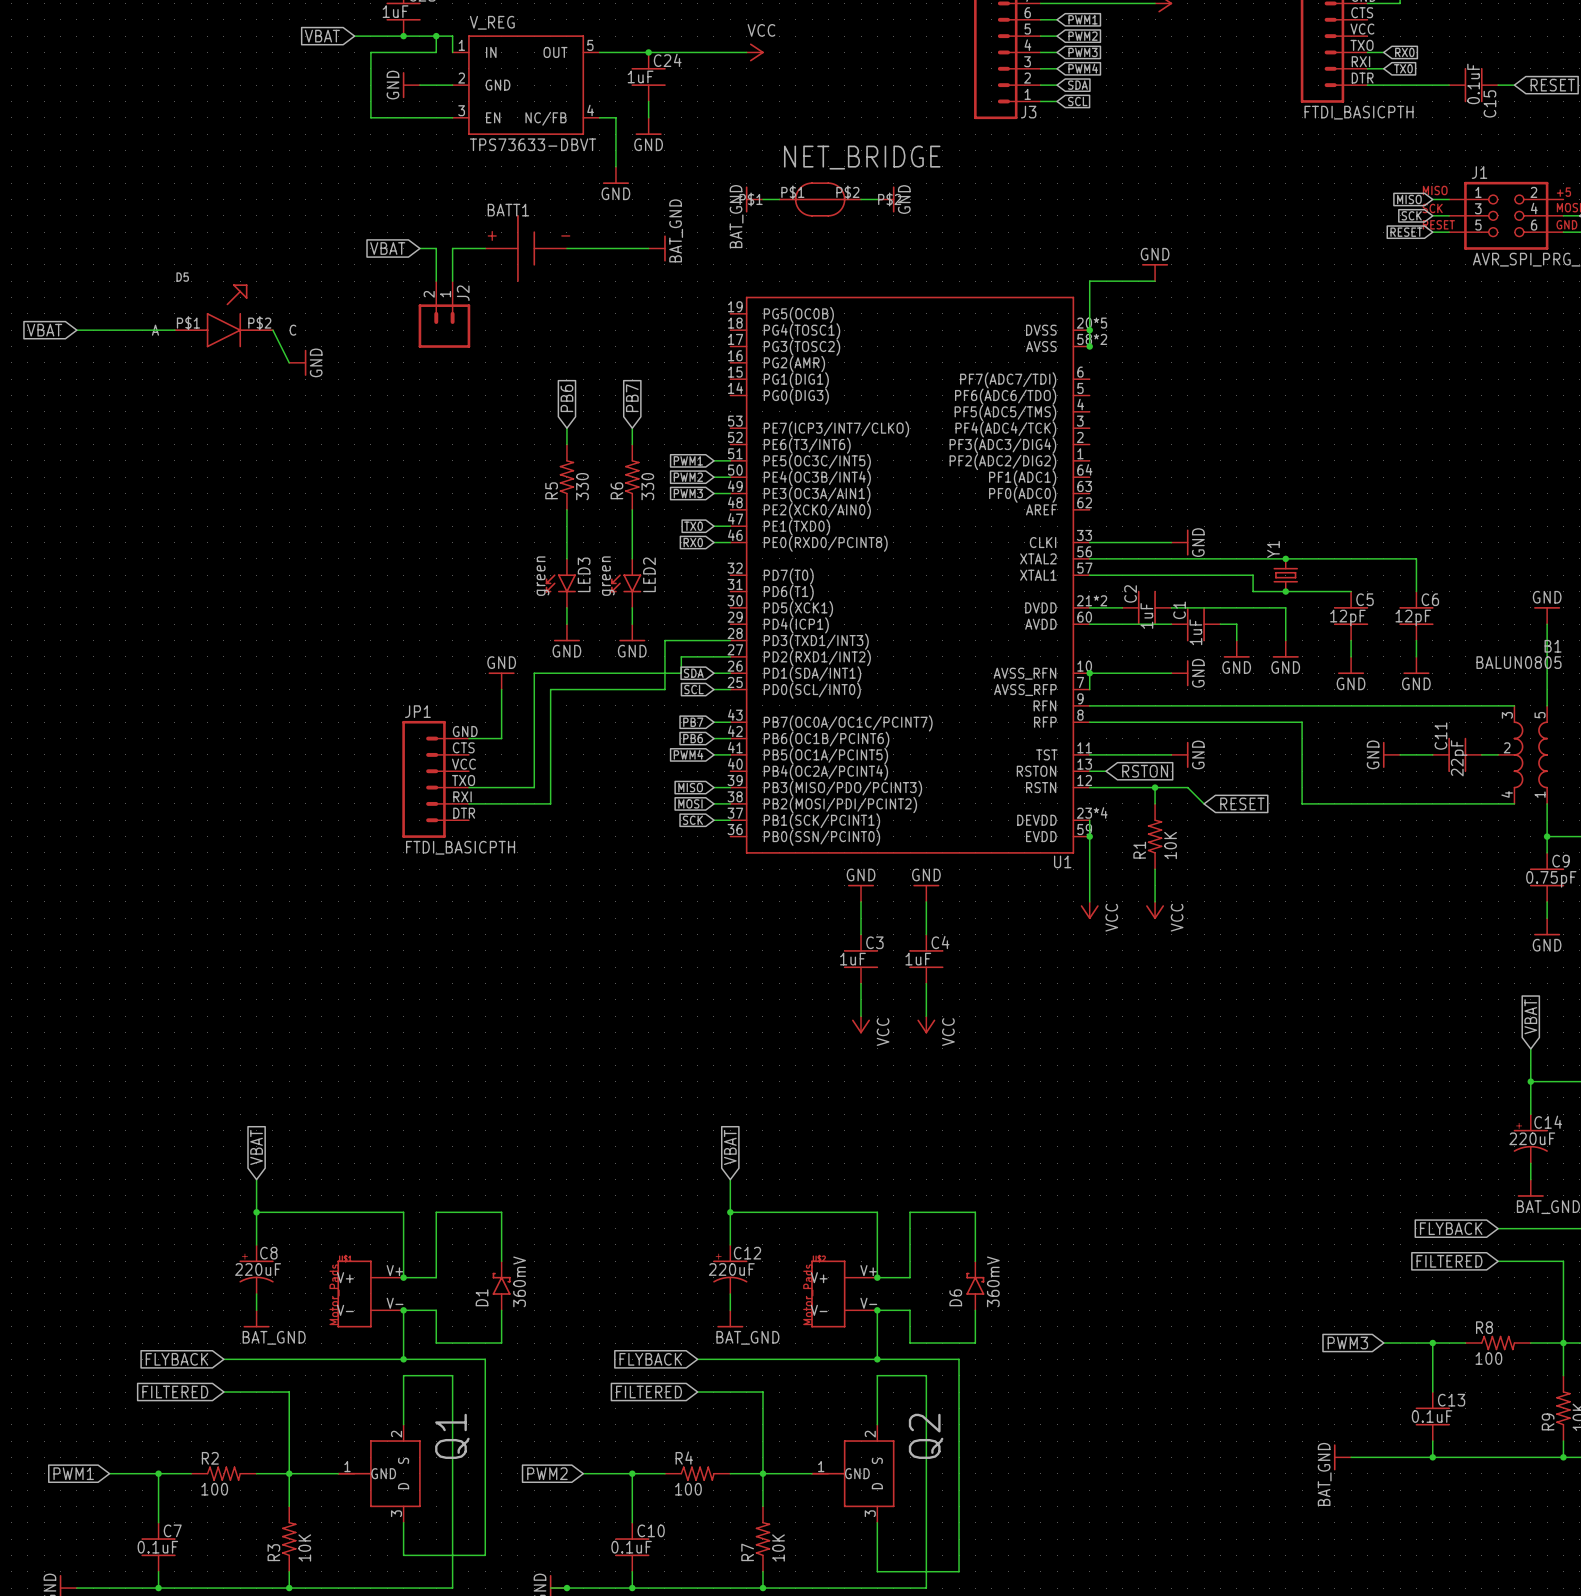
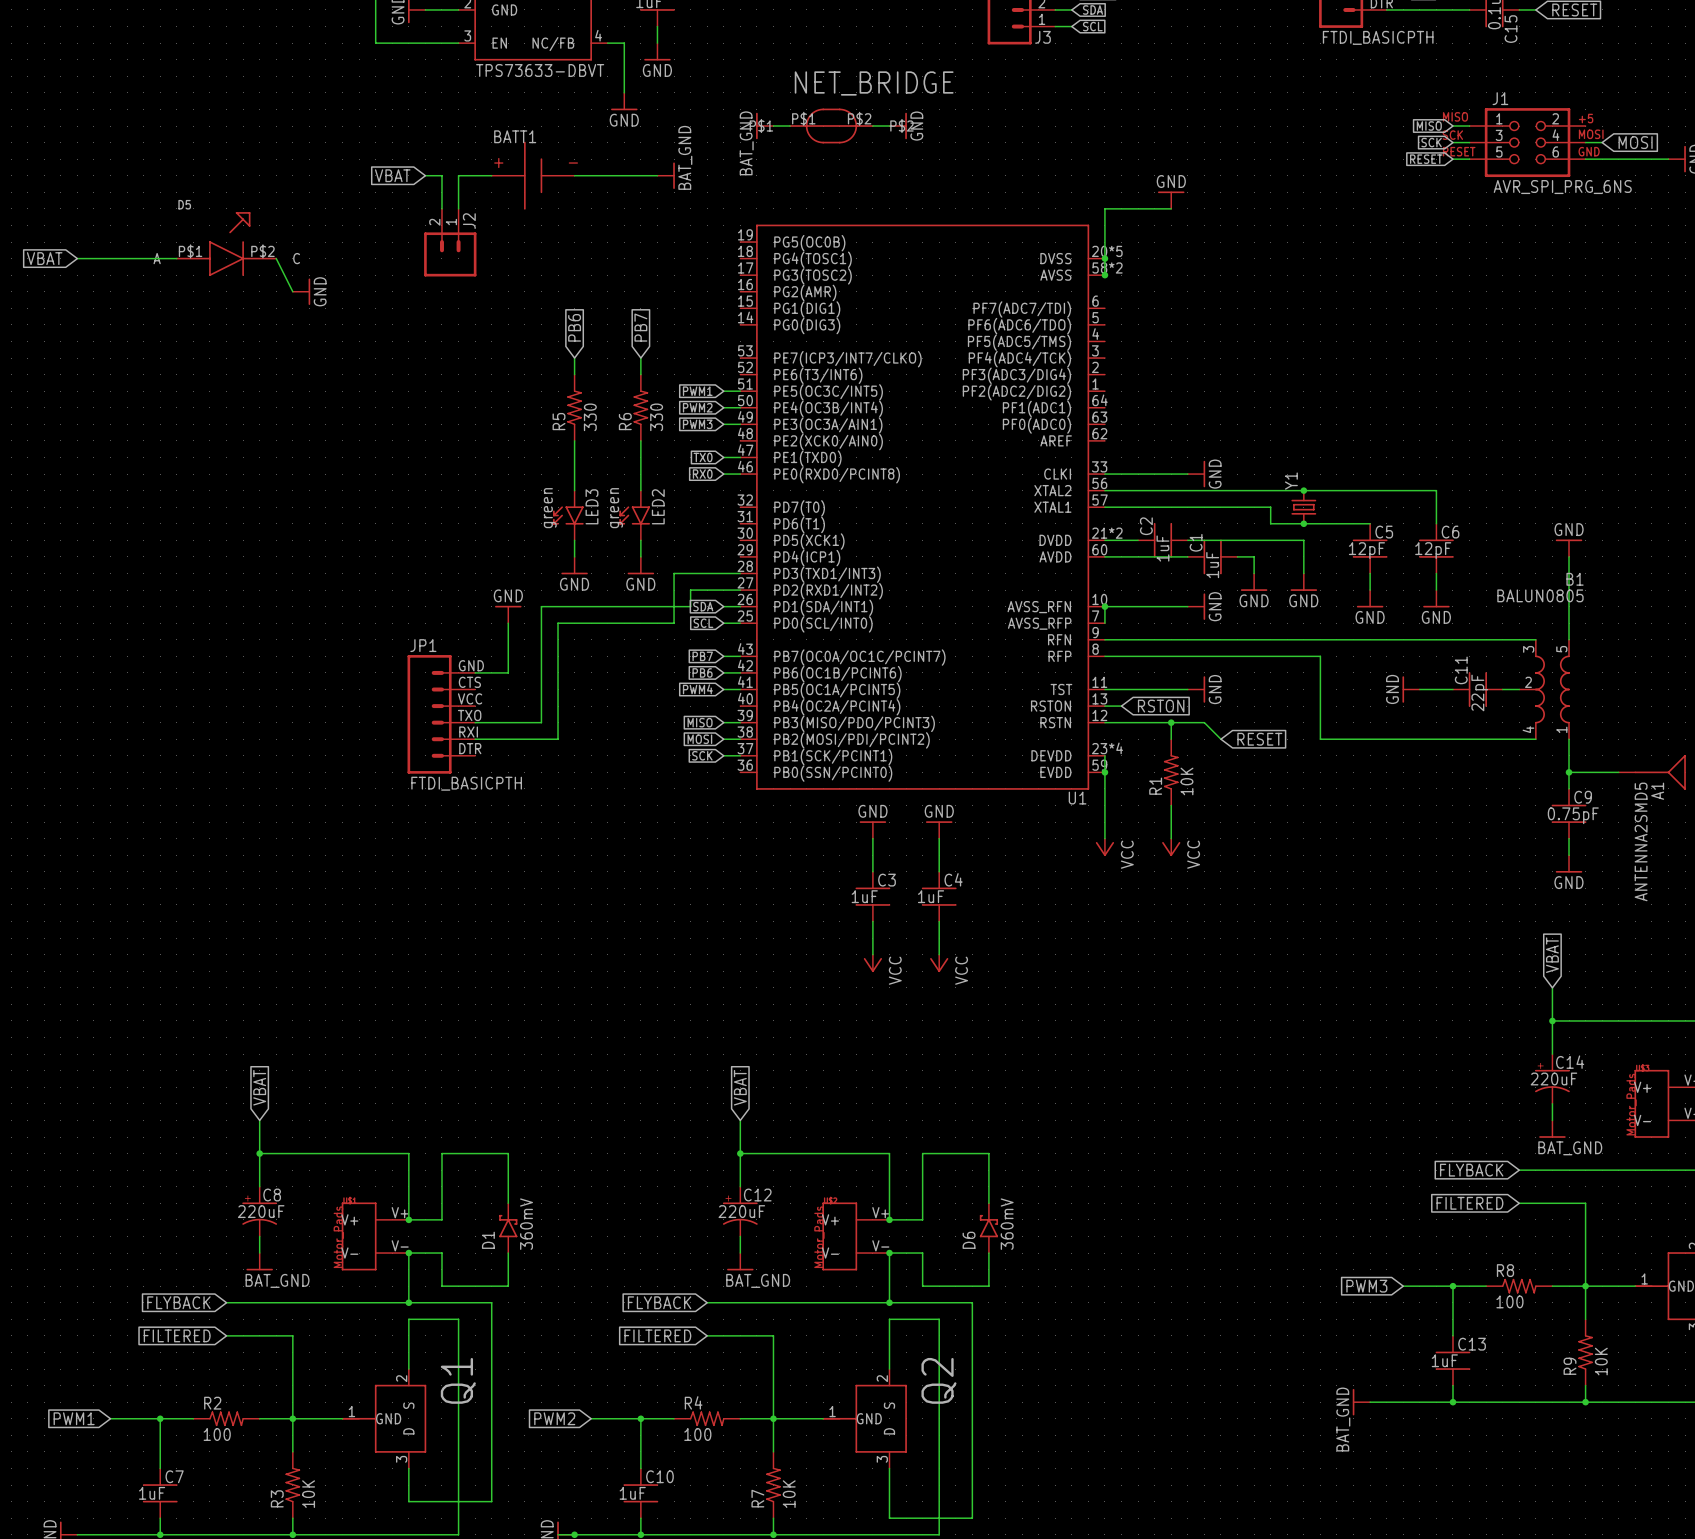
C13 value: 0.1uF (1432, 1416) -> 1uF (1444, 1360)
C7 value: 0.1uF (157, 1547) -> 1uF (152, 1493)
C10 value: 0.1uF (631, 1547) -> 1uF (632, 1493)

